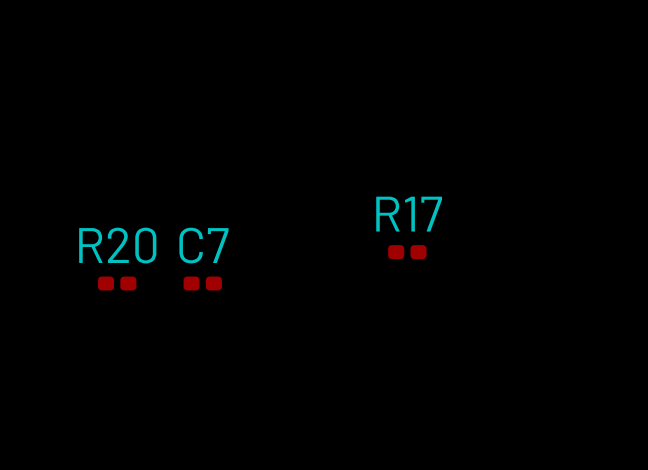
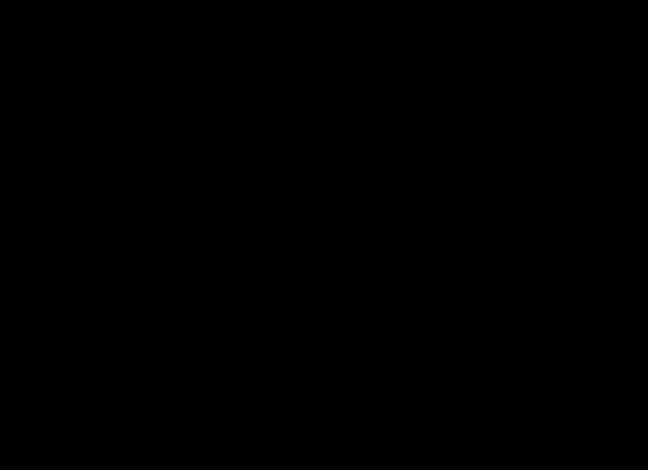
R17: (407, 252) -> none
R20: (117, 283) -> none
C7: (202, 283) -> none

